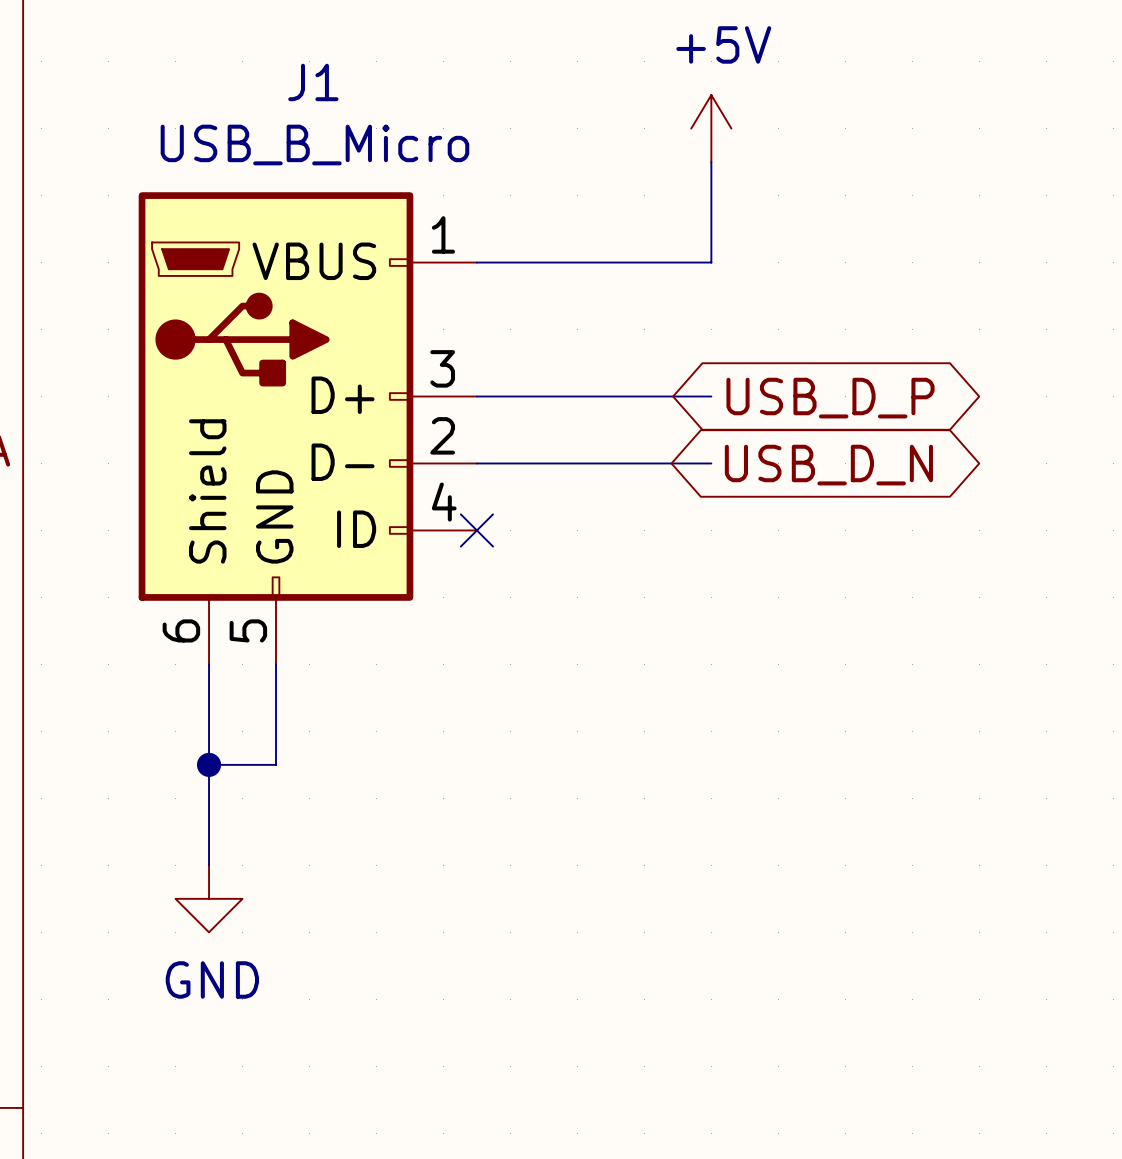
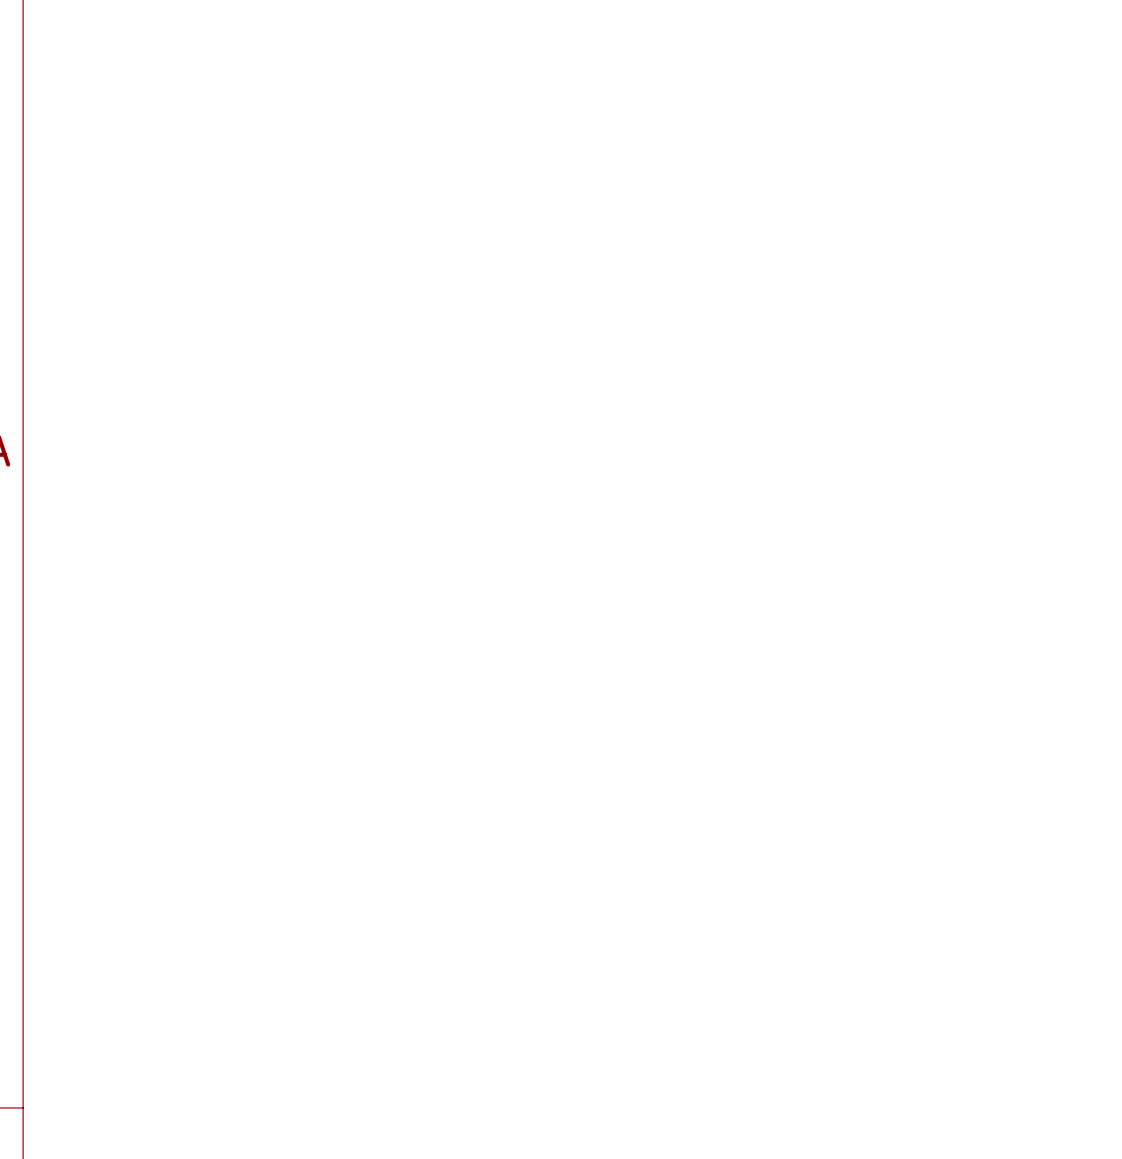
power symbol: +5V (711, 128) -> none
wire: (711, 162) (711, 262) (476, 262) -> none
wire: (476, 396) (711, 396) -> none
global label: USB_D_P (830, 398) -> none
J1: USB_B_Micro (307, 428) -> none
wire: (476, 463) (711, 463) -> none
global label: USB_D_N (828, 465) -> none
no-connect mark: (476, 530) -> none
wire: (209, 664) (209, 865) -> none
wire: (275, 664) (275, 764) (209, 764) -> none
junction: (209, 764) -> none
power symbol: GND (209, 898) -> none

